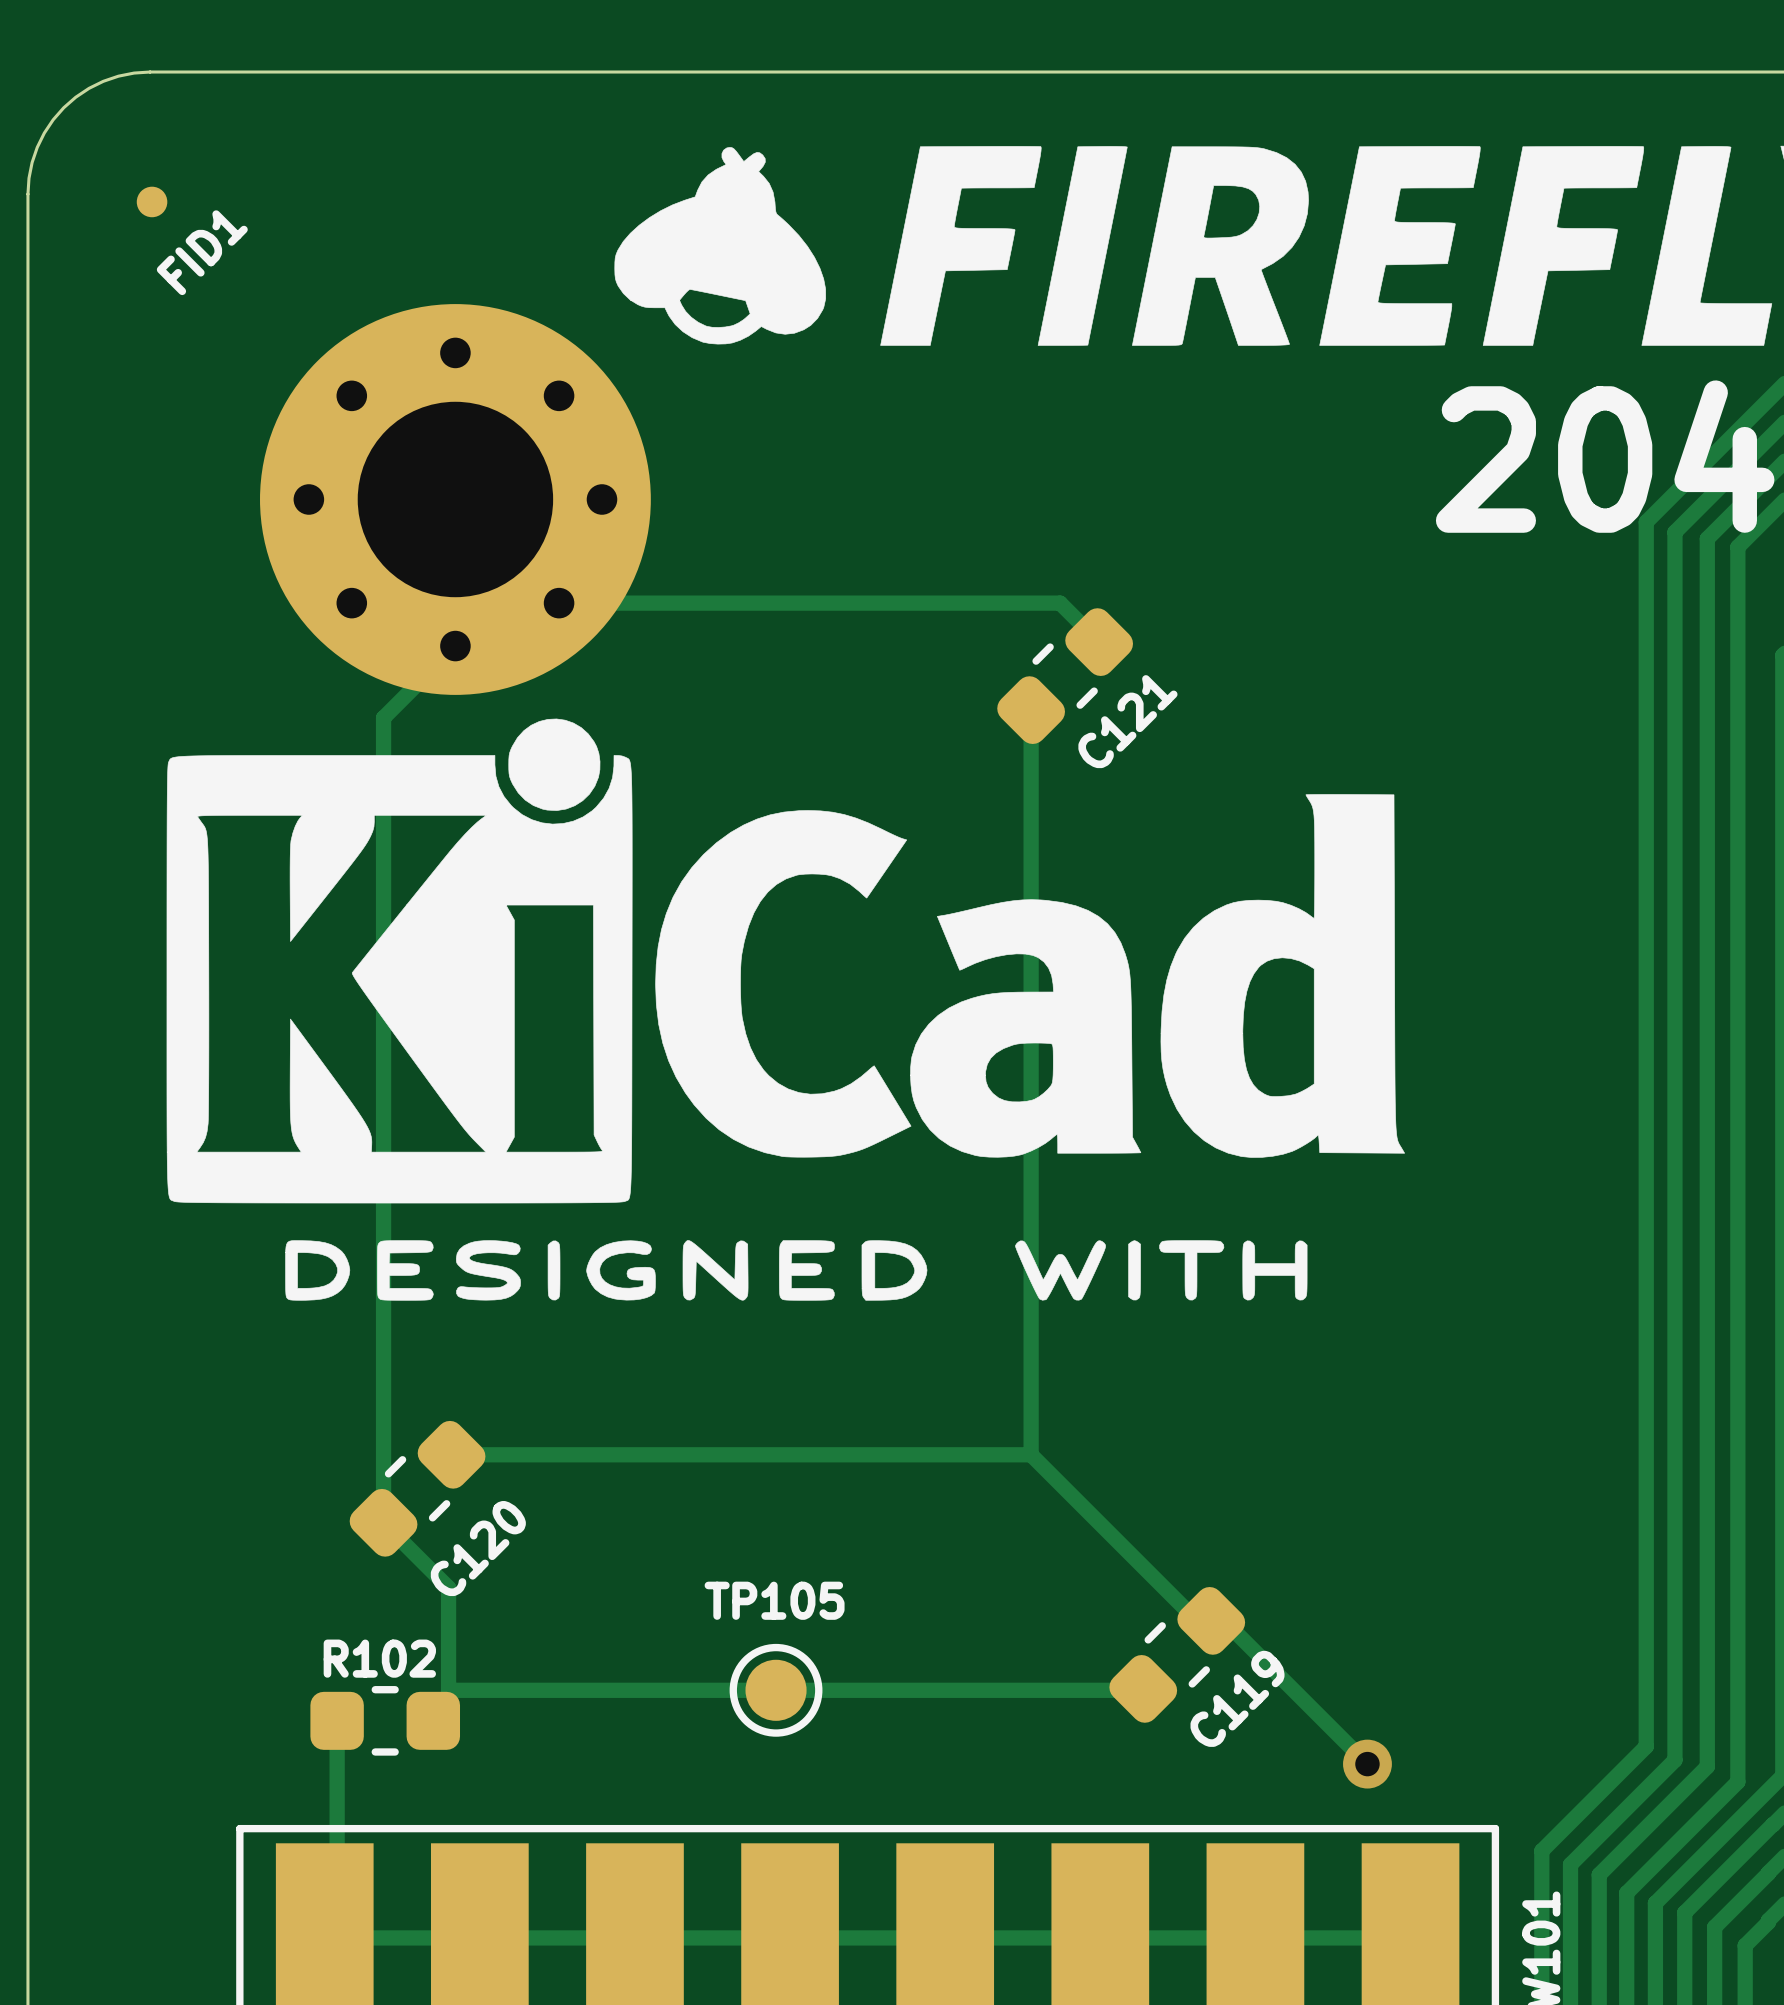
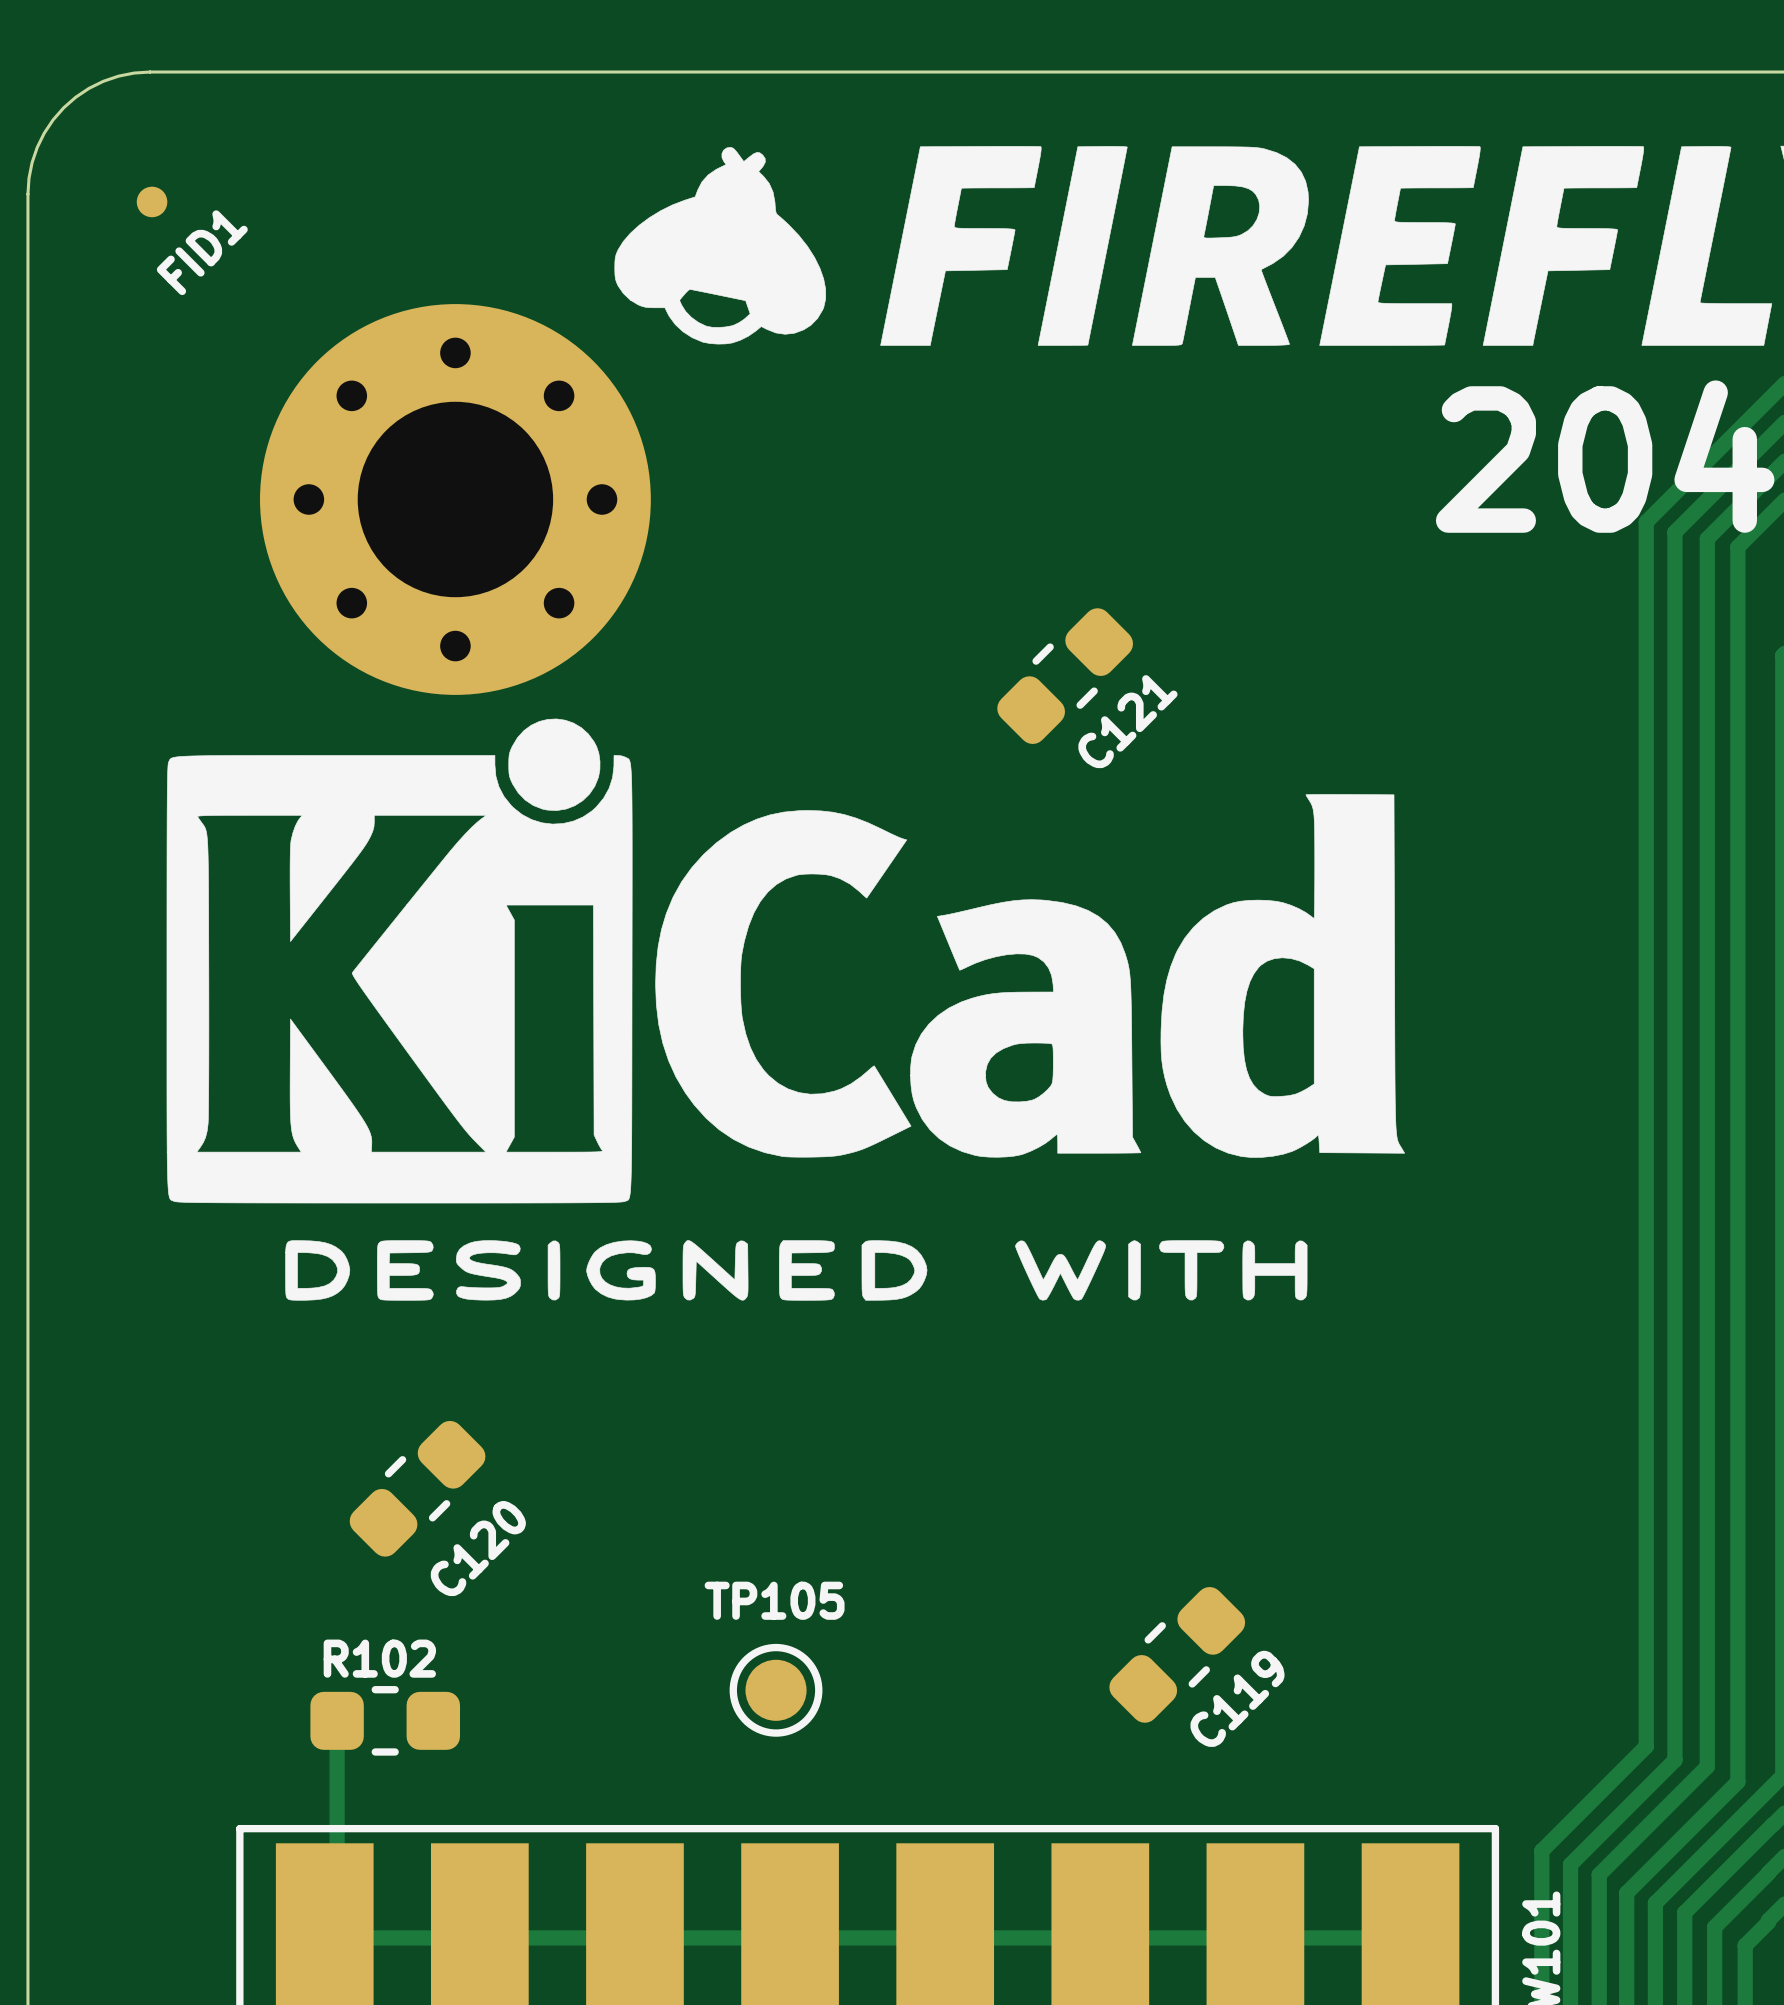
track: (498, 603) (1060, 603) (1099, 642) -> none
track: (498, 603) (383, 717) (383, 1522) (448, 1587) (448, 1705) (433, 1720) -> none
track: (1031, 710) (1031, 1454) -> none
track: (451, 1454) (1031, 1454) -> none
track: (1031, 1454) (1197, 1620) (1224, 1620) (1367, 1764) -> none
track: (1143, 1688) (448, 1690) -> none
via: (1367, 1764) -> none

